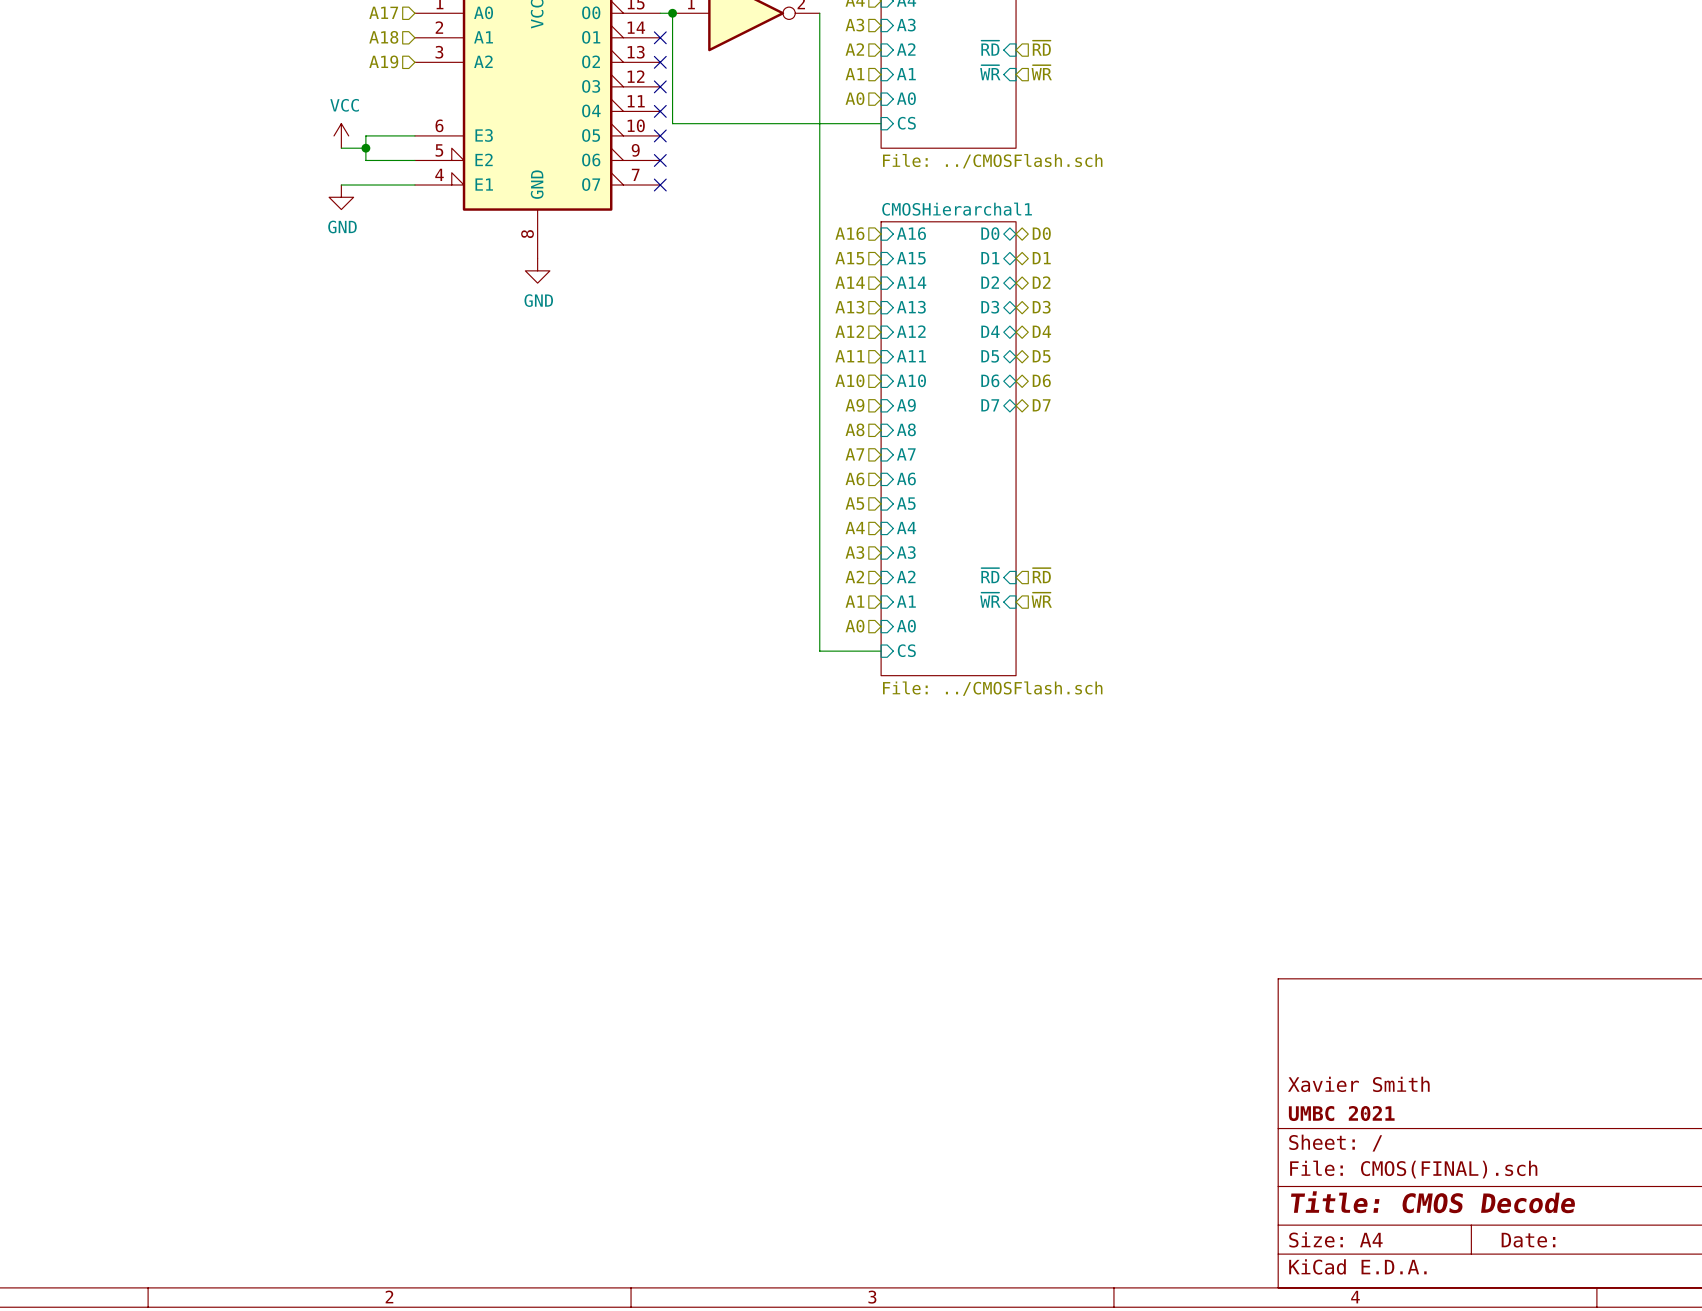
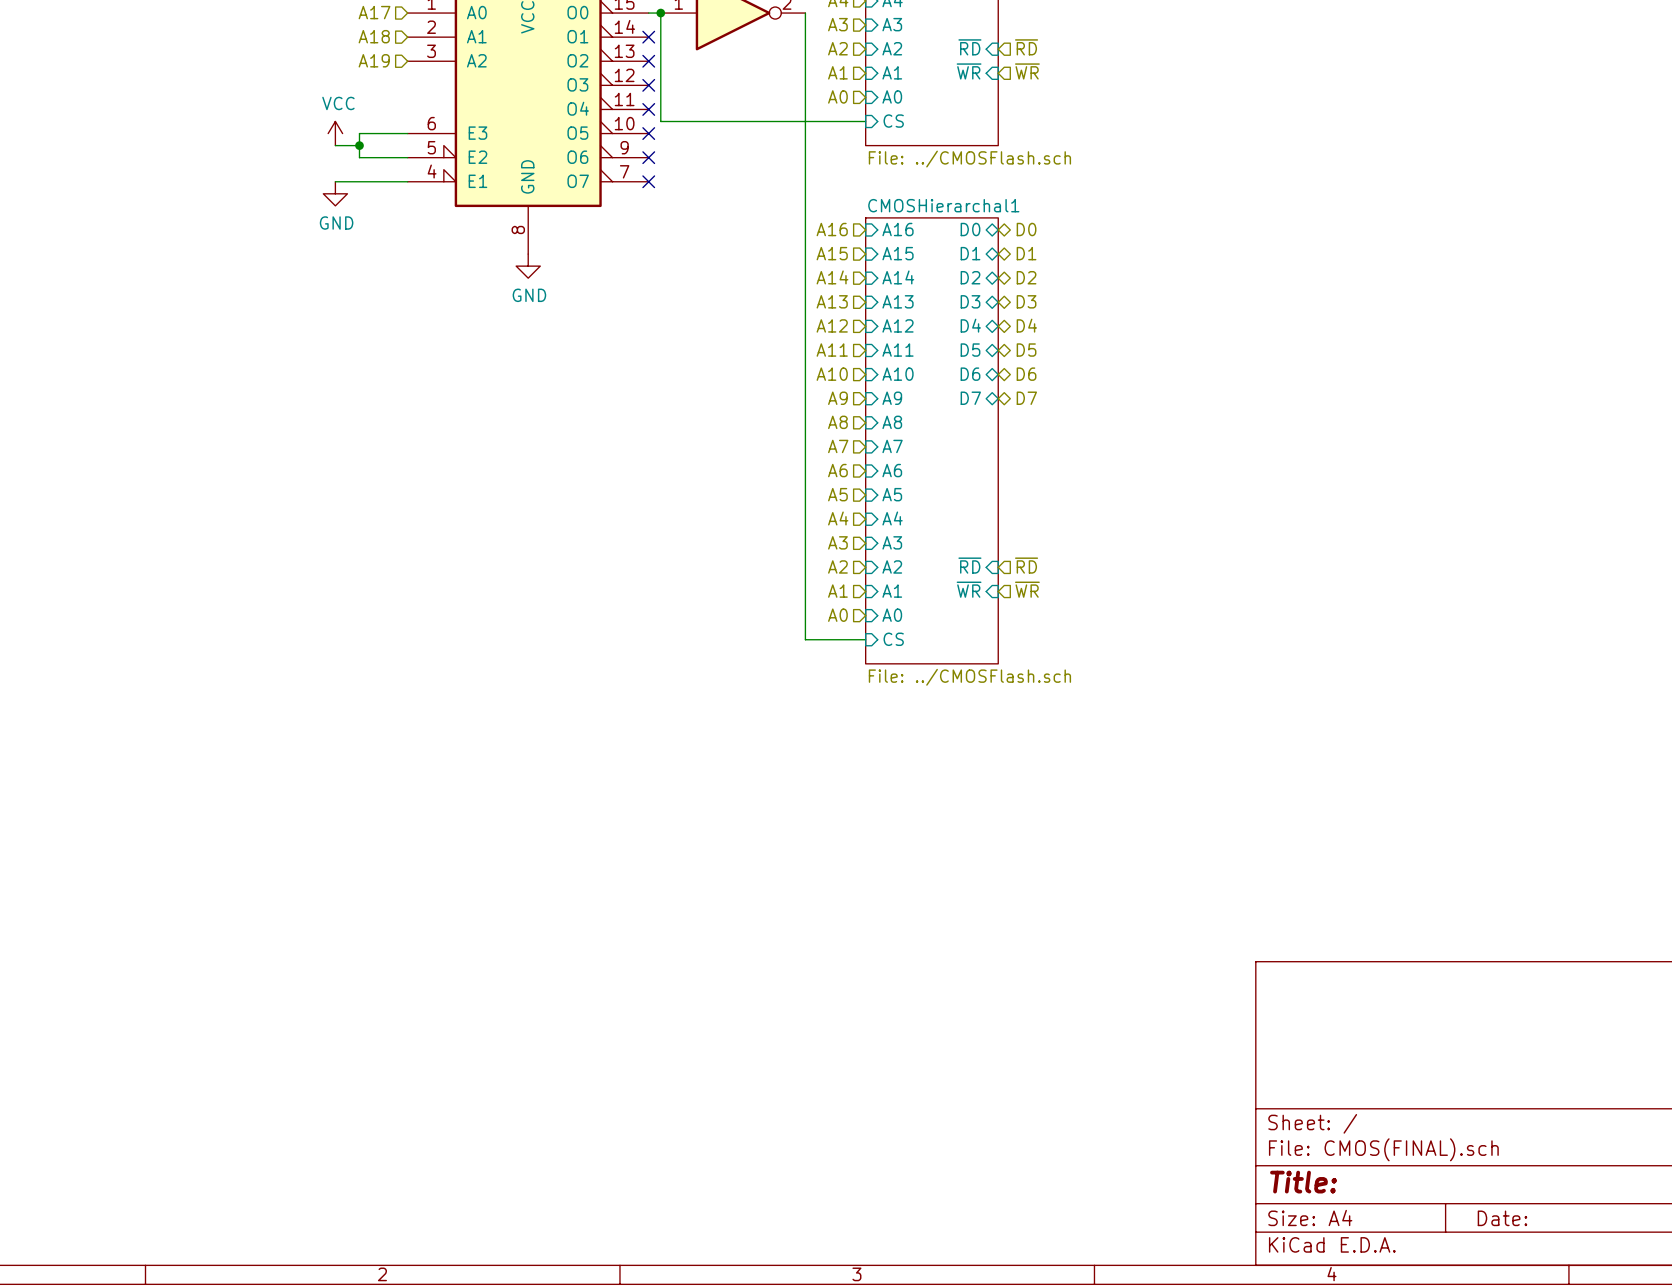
title block: Xavier Smith (1358, 1084) -> none
title block: UMBC 2021 (1341, 1113) -> none
title block: Title: CMOS Decode (1433, 1202) -> Title: (1303, 1182)

